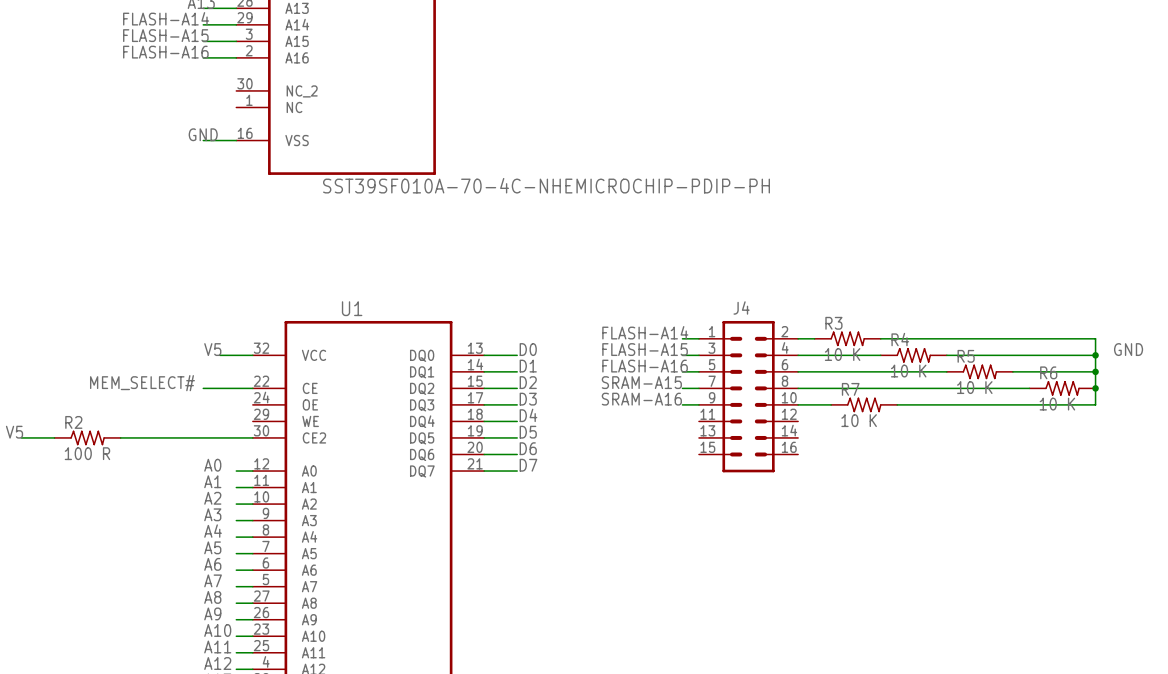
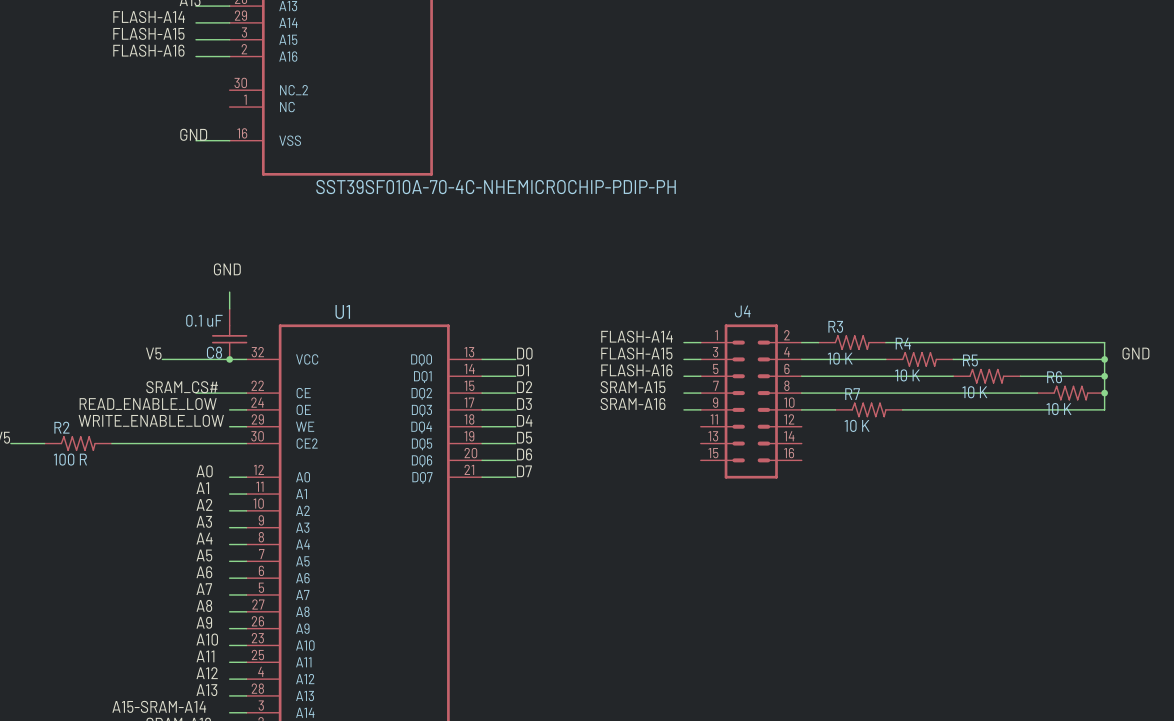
label: none -> GND (227, 269)
wire: none -> (229, 292) (229, 308)
C8: none -> 0.1 uF (229, 334)
label position: V5 (212, 349) -> V5 (153, 353)
wire: none -> (162, 359) (212, 359)
junction: none -> (229, 359)
label: MEM_SELECT# (142, 383) -> none
label: none -> SRAM_CS# (182, 387)
label: none -> READ_ENABLE_LOW (148, 404)
wire: none -> (229, 409) (246, 409)
label: none -> WRITE_ENABLE_LOW (151, 420)
wire: none -> (229, 426) (246, 426)

